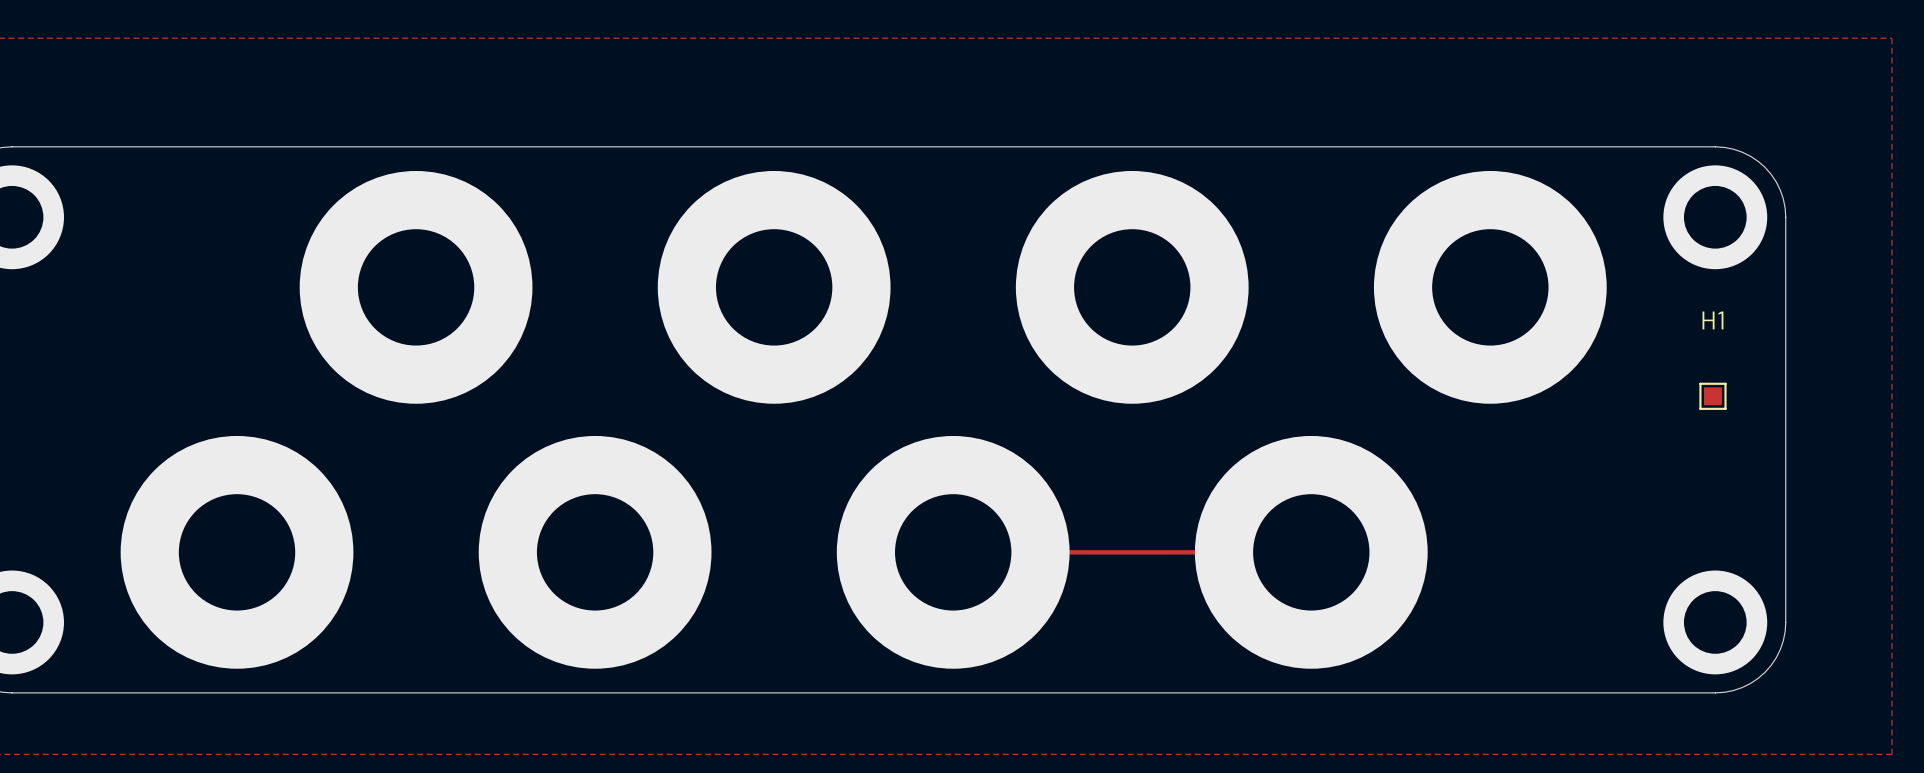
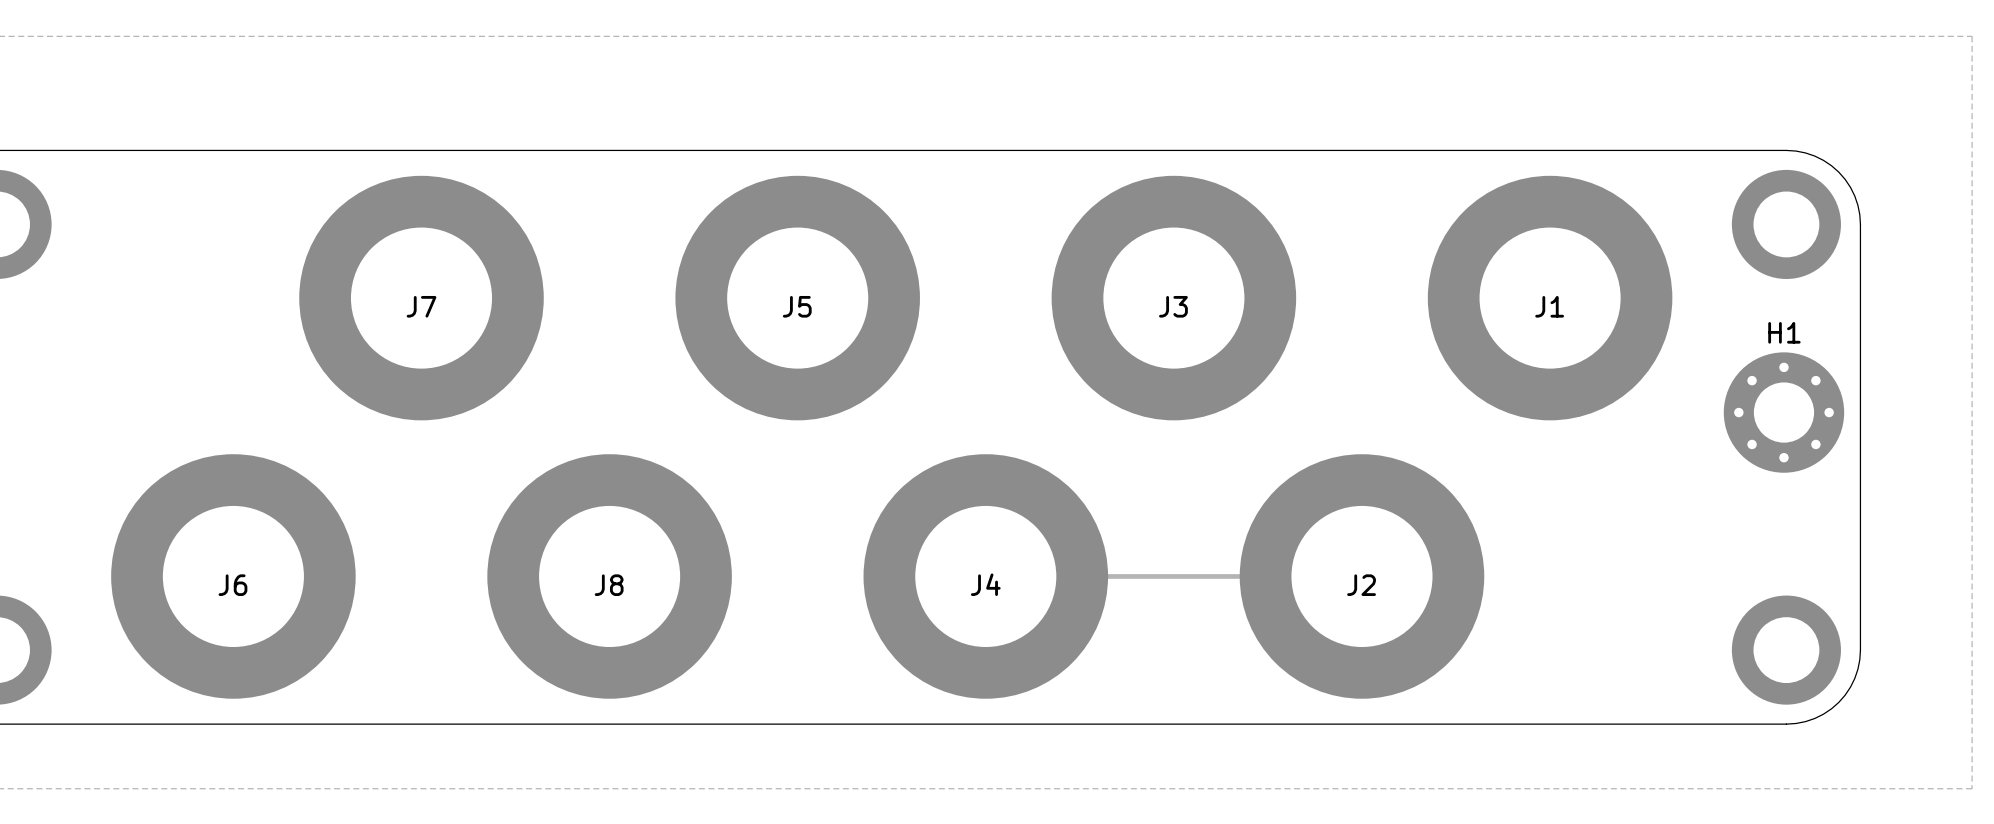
J7: none -> (421, 298)
via: (416, 287) -> none
J5: none -> (797, 298)
via: (774, 287) -> none
J3: none -> (1173, 298)
via: (1132, 287) -> none
J1: none -> (1550, 298)
via: (1490, 287) -> none
H1 footprint: [1699, 382, 1727, 410] -> [1723, 352, 1845, 473]
J6: none -> (233, 576)
via: (237, 552) -> none
J8: none -> (609, 576)
via: (595, 552) -> none
J4: none -> (985, 576)
via: (953, 552) -> none
J2: none -> (1361, 576)
via: (1311, 552) -> none

